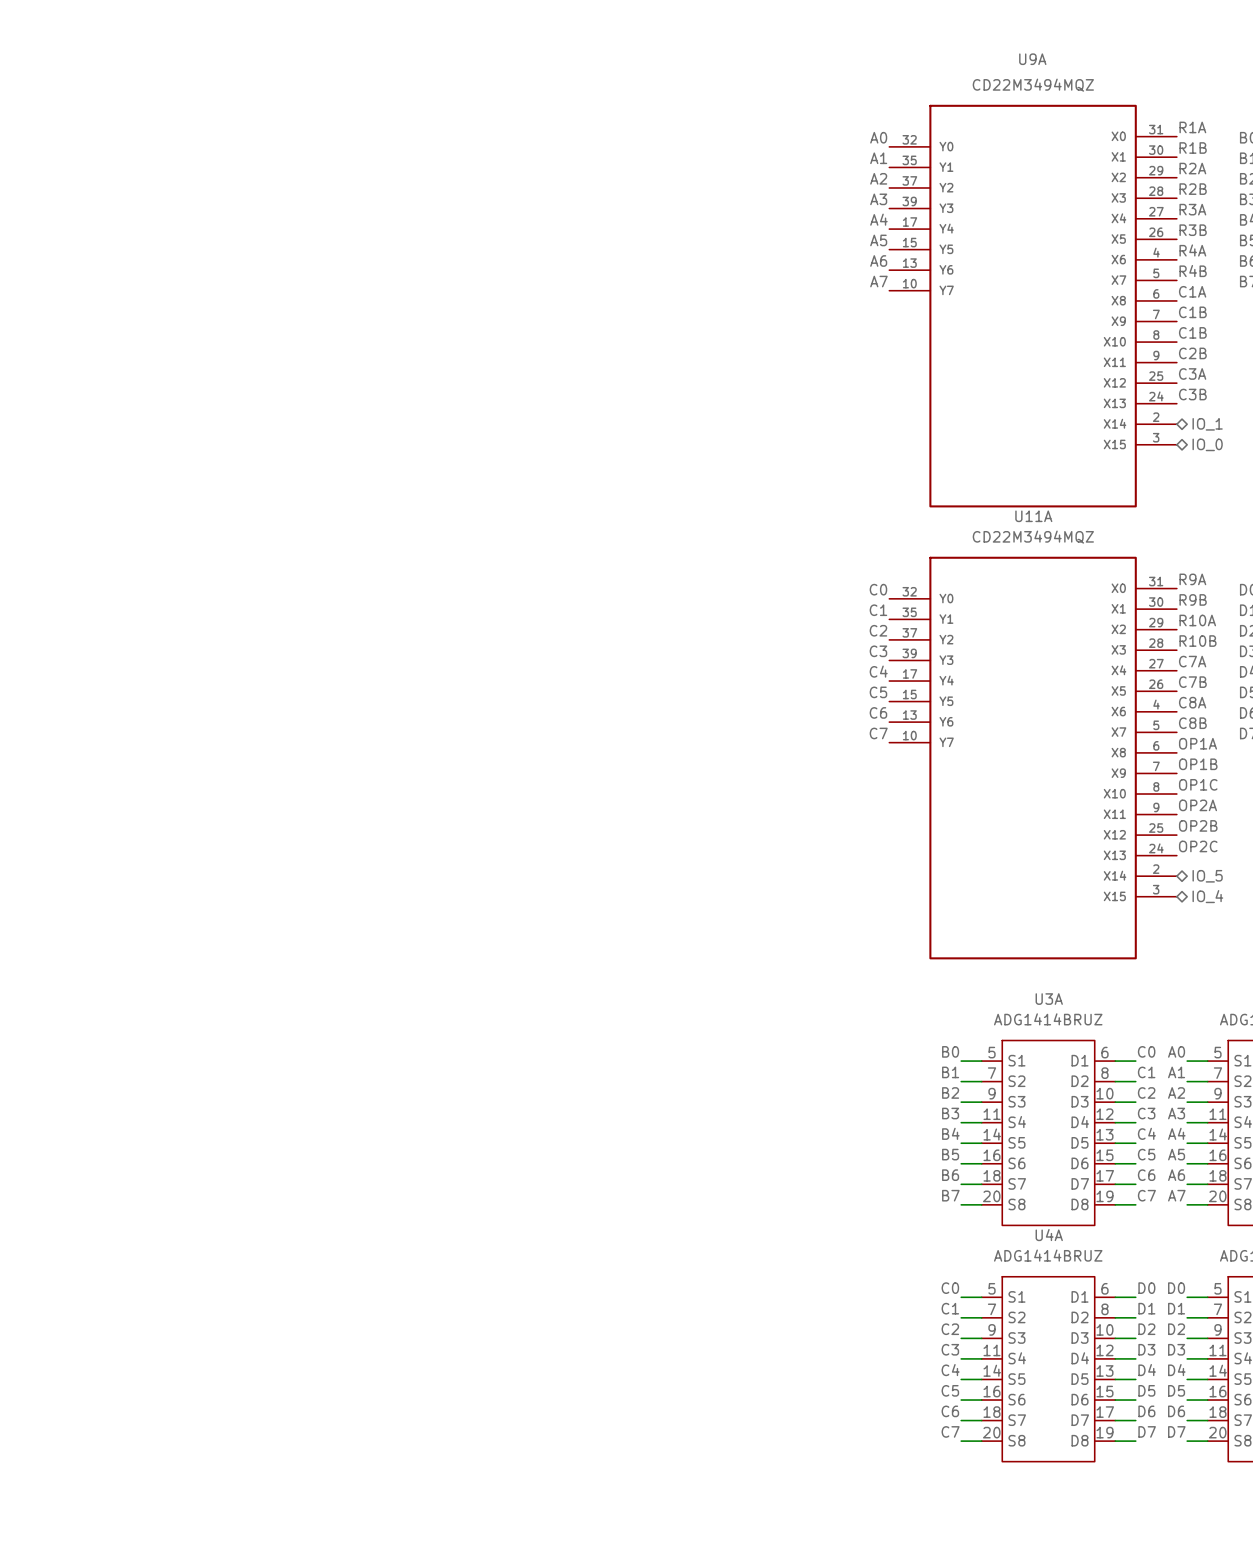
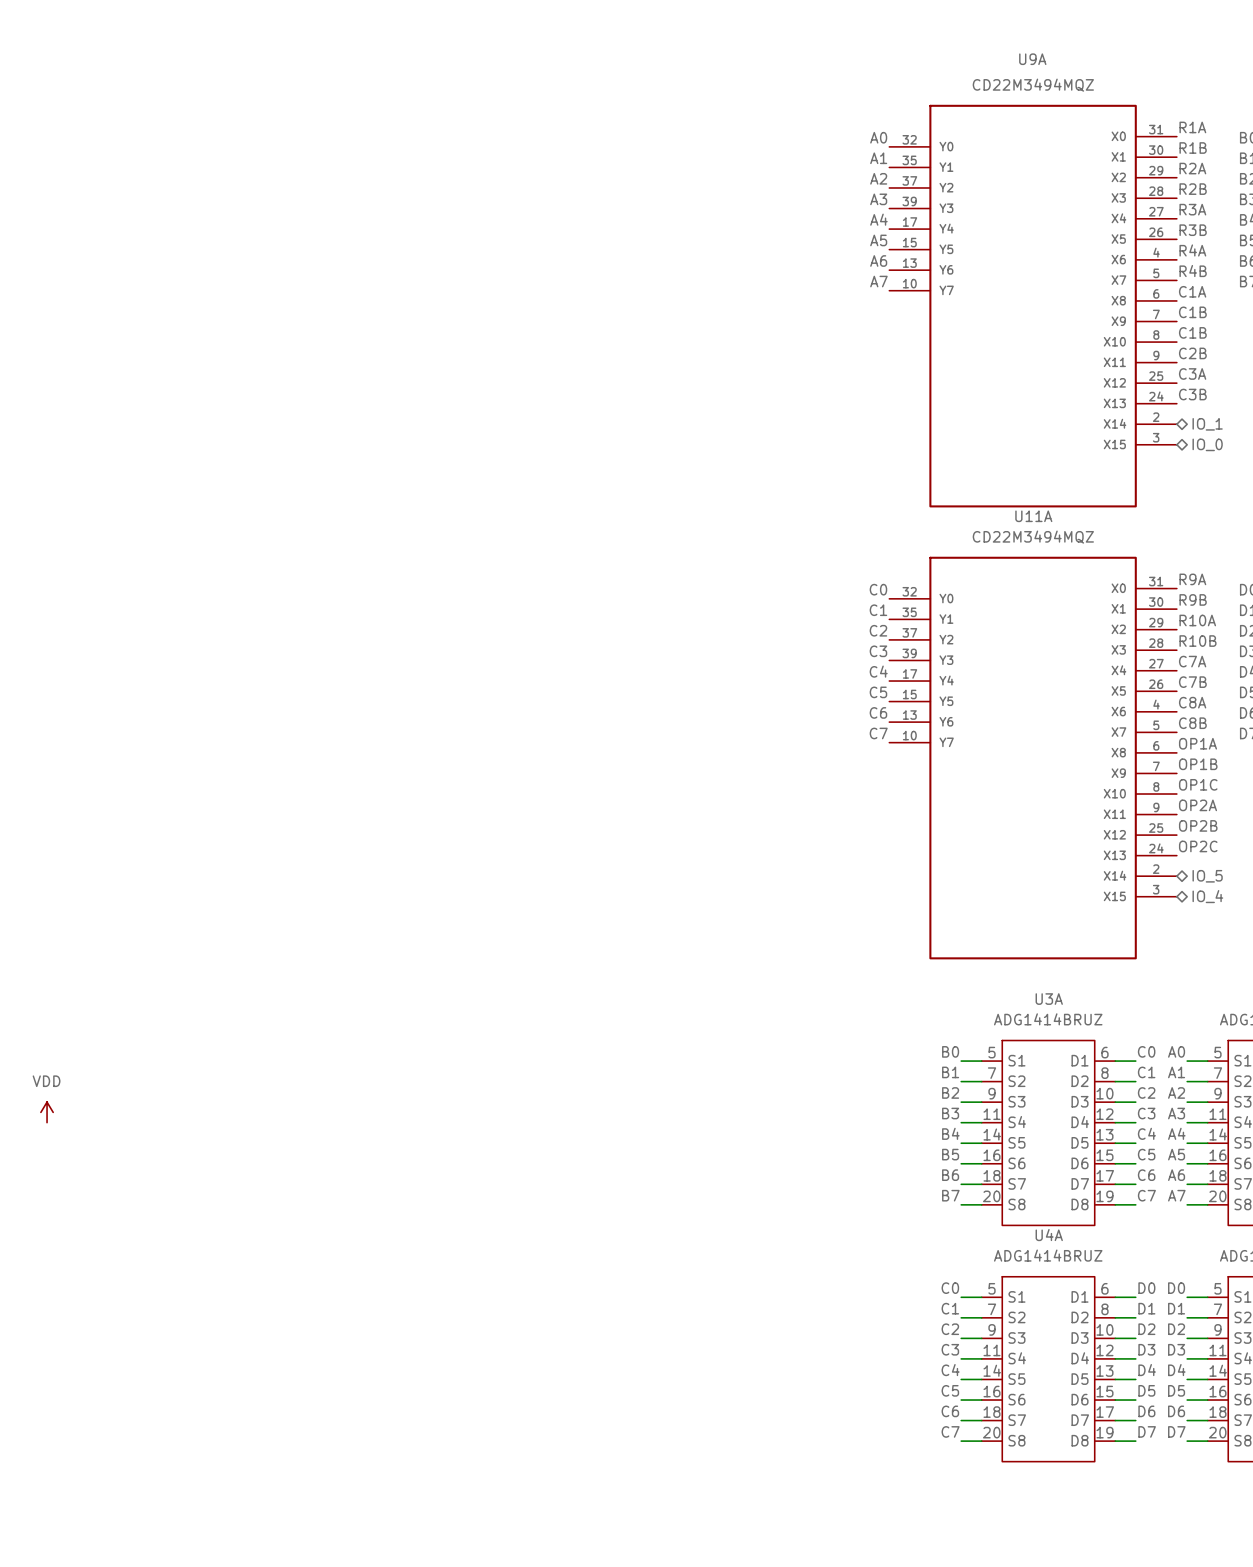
power symbol: none -> VDD (47, 1112)

